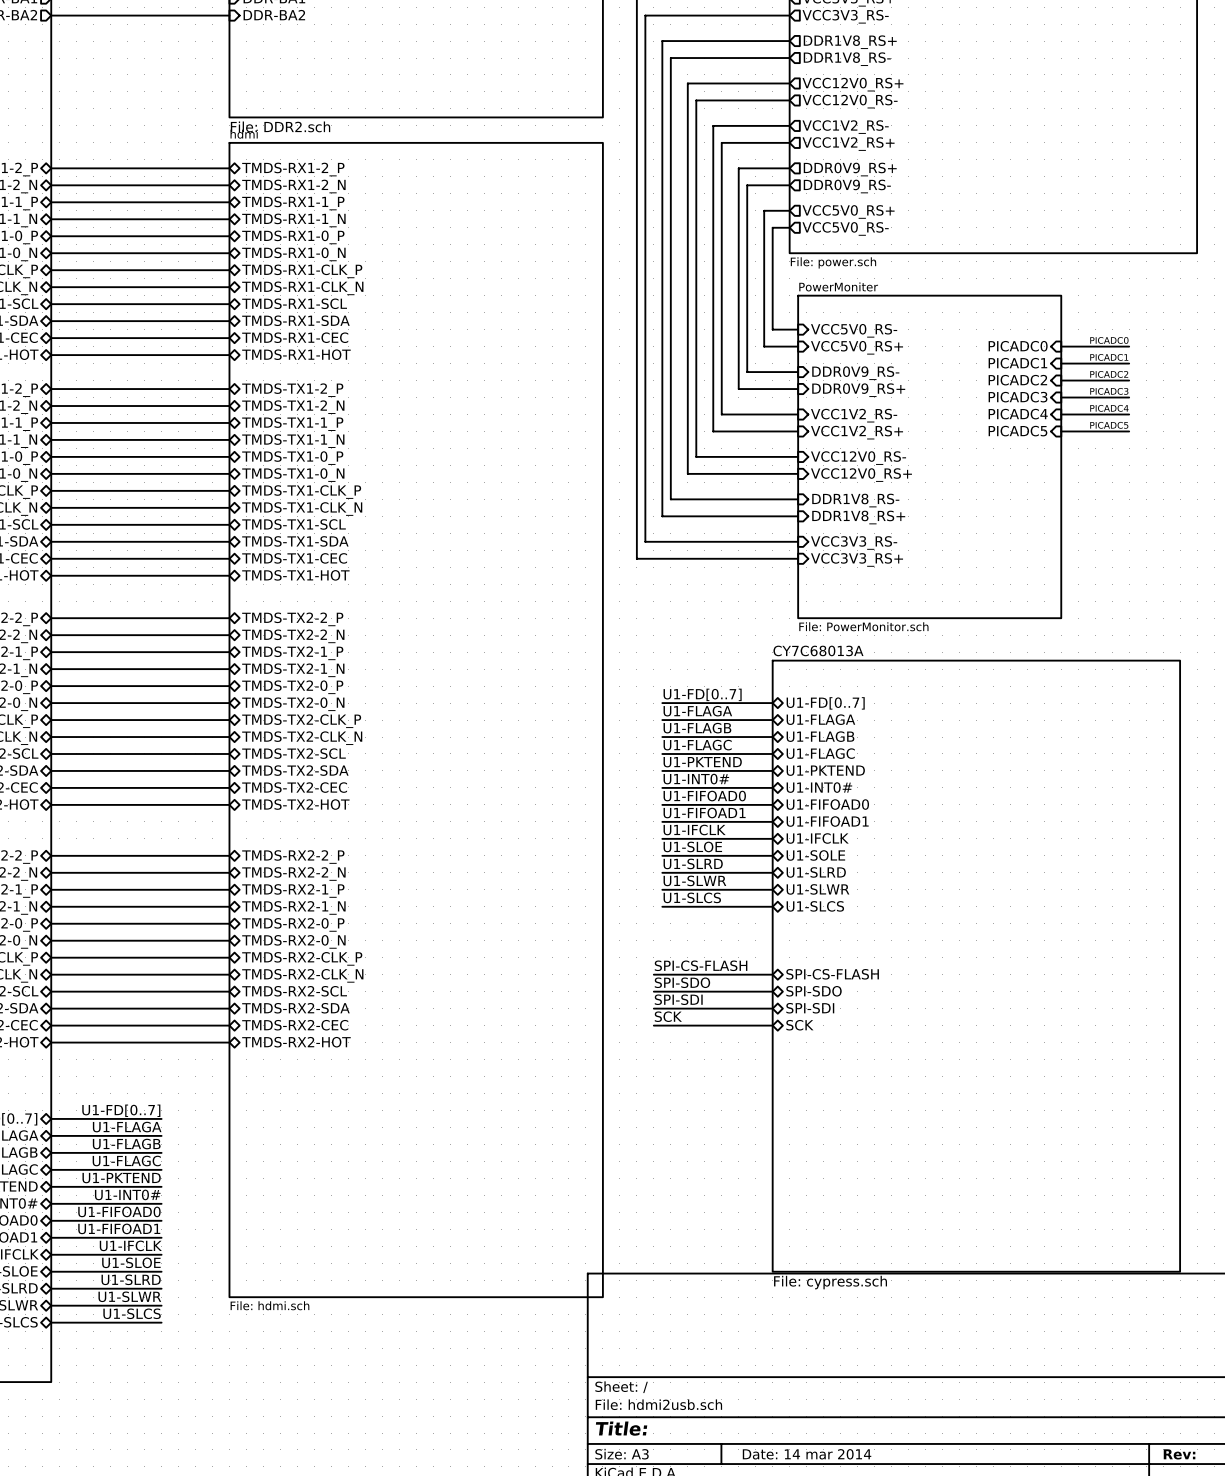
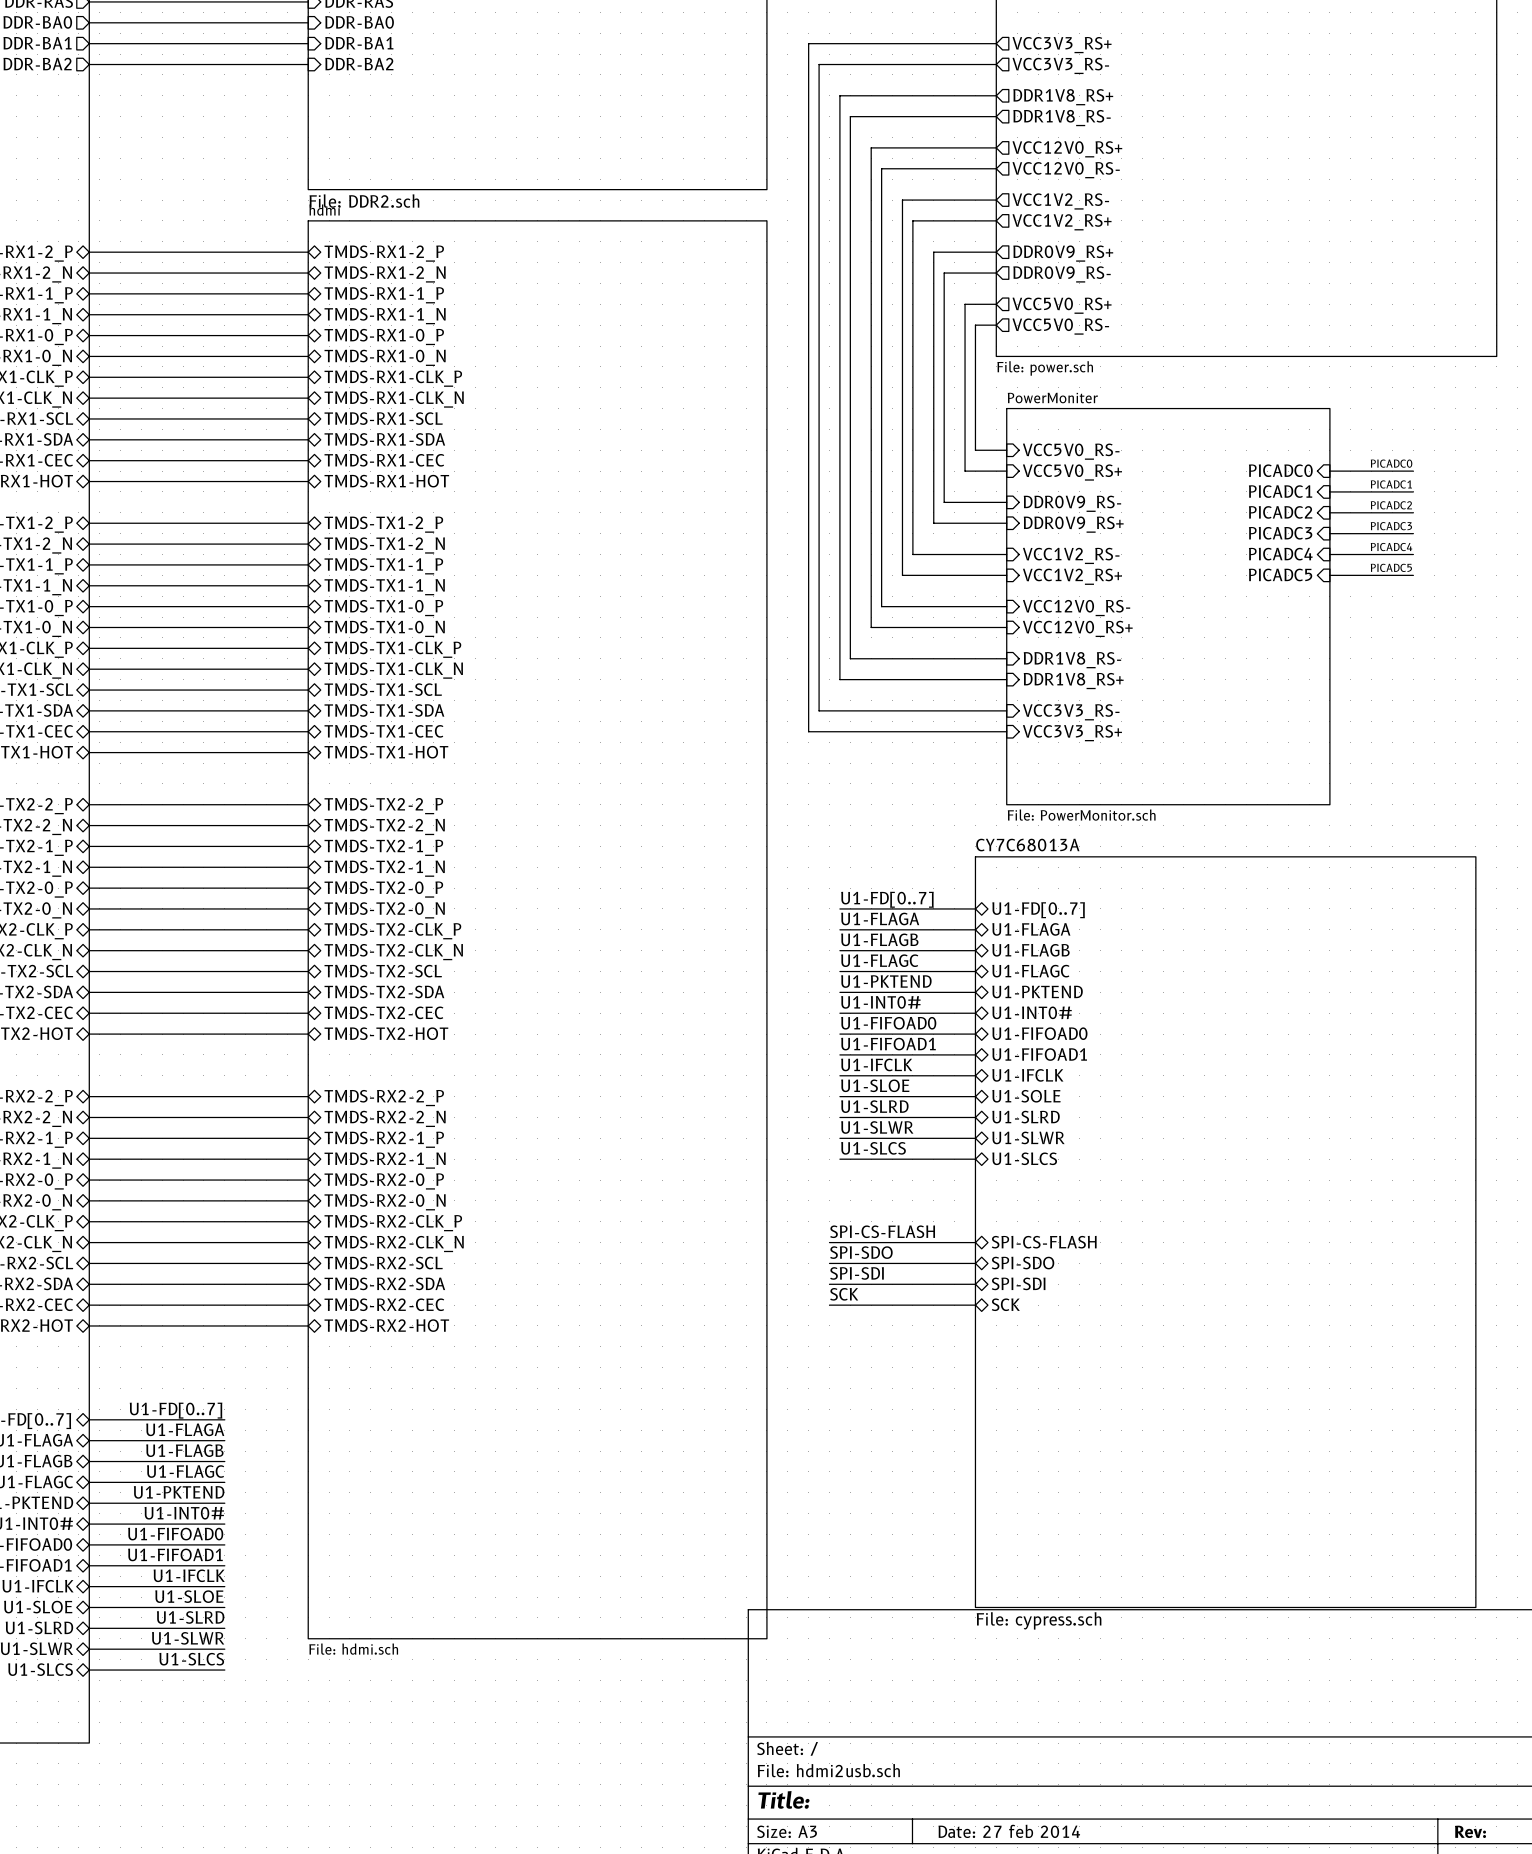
title block: Date: 14 mar 2014 (807, 1454) -> Date: 27 feb 2014 (1009, 1831)

